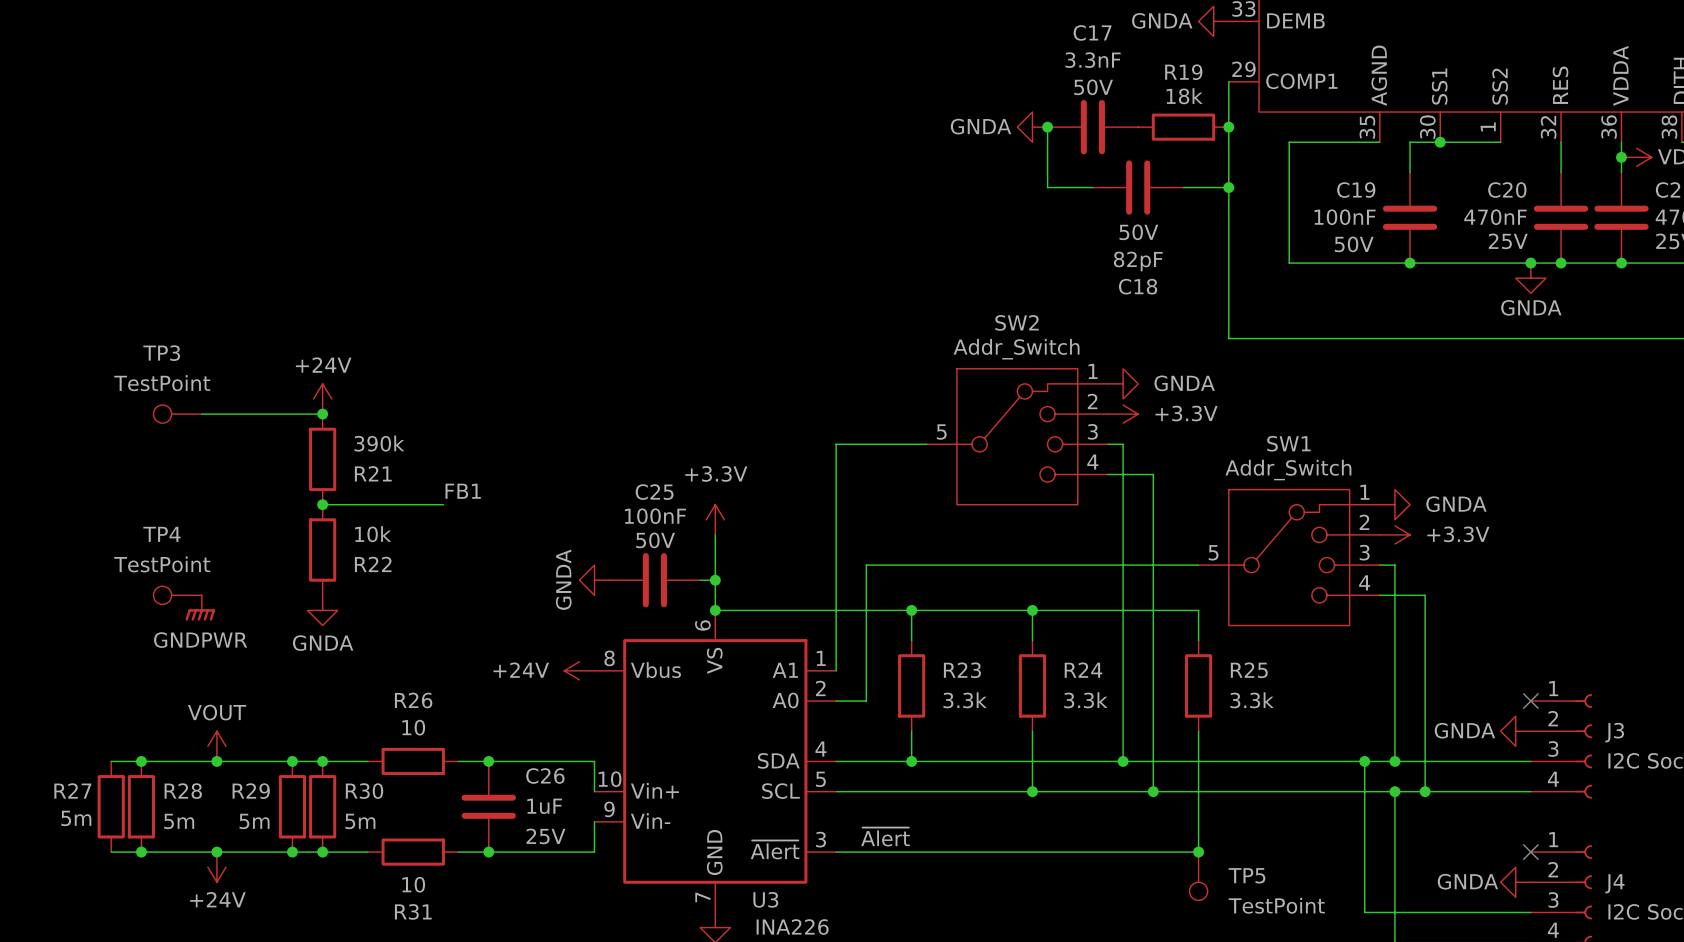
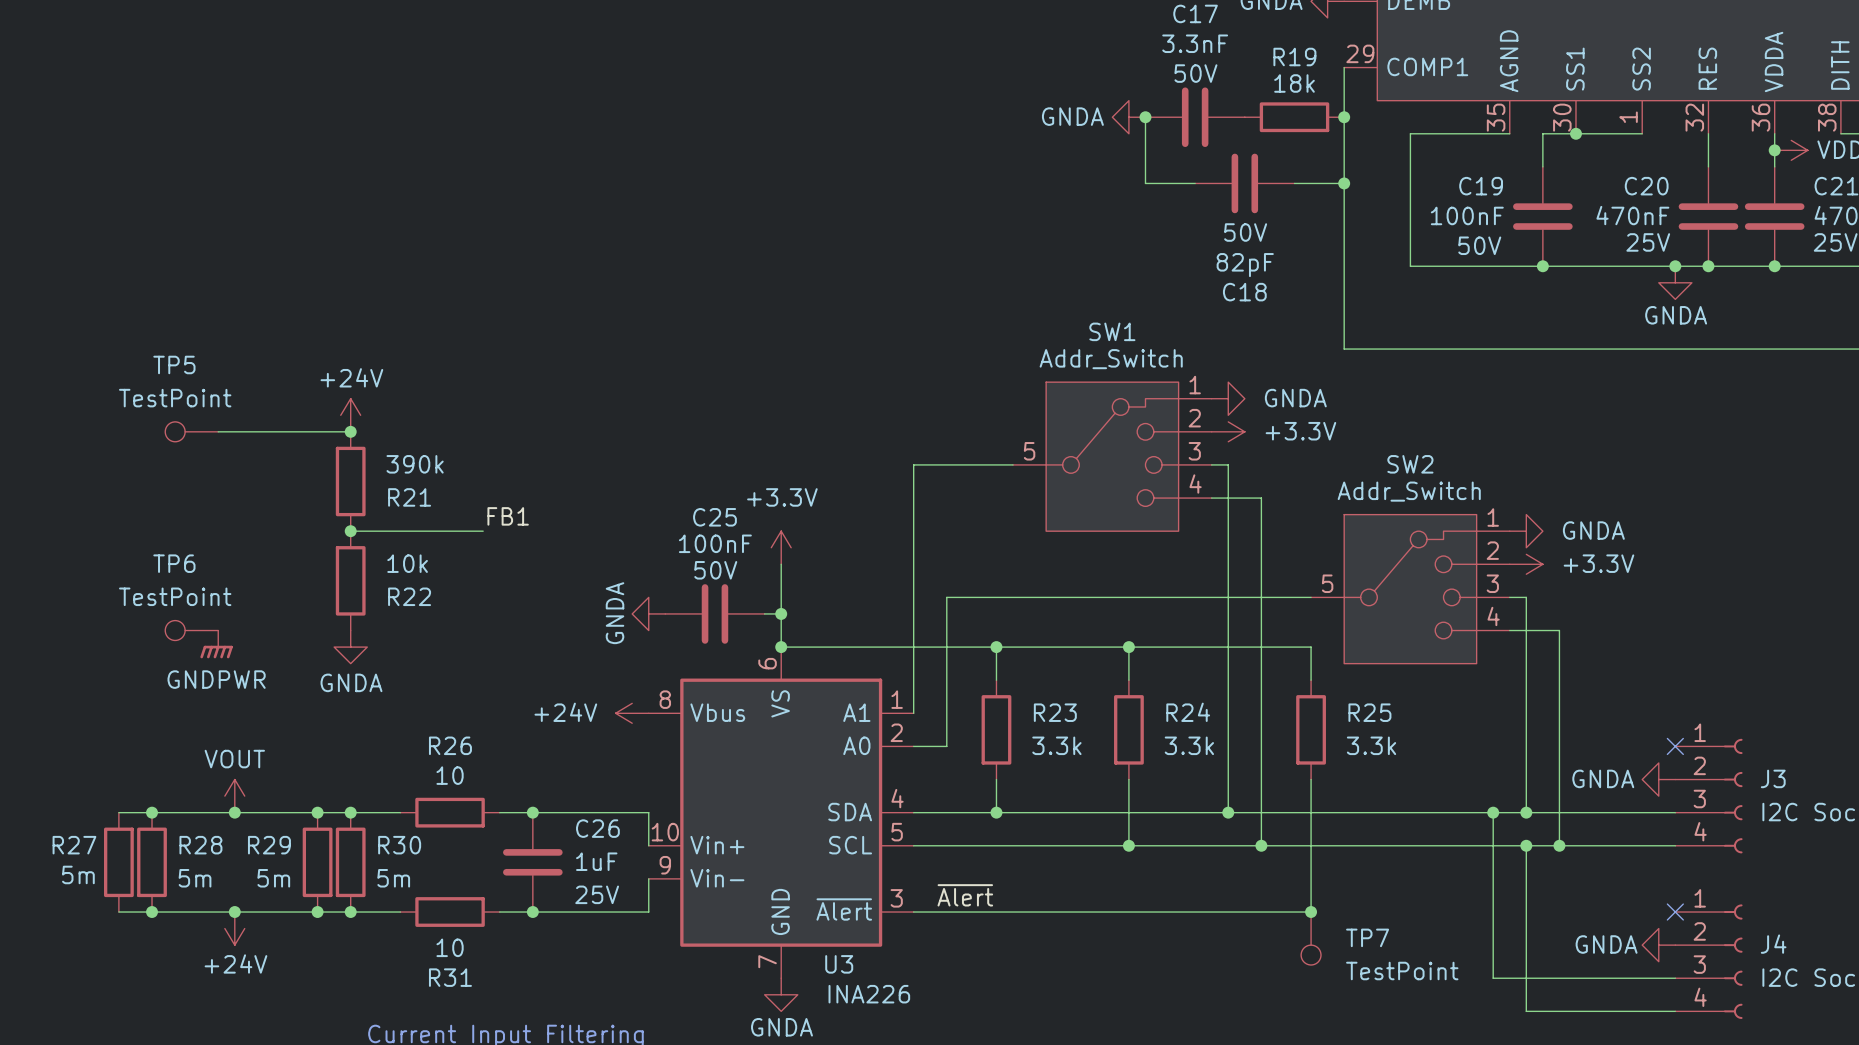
SW2 name: SW2 (1017, 322) -> SW1 (1112, 331)
TP3 name: TP3 (161, 353) -> TP5 (174, 364)
SW1 name: SW1 (1288, 443) -> SW2 (1410, 464)
TP4 name: TP4 (161, 534) -> TP6 (174, 563)
TP5 name: TP5 (1247, 875) -> TP7 (1367, 937)

